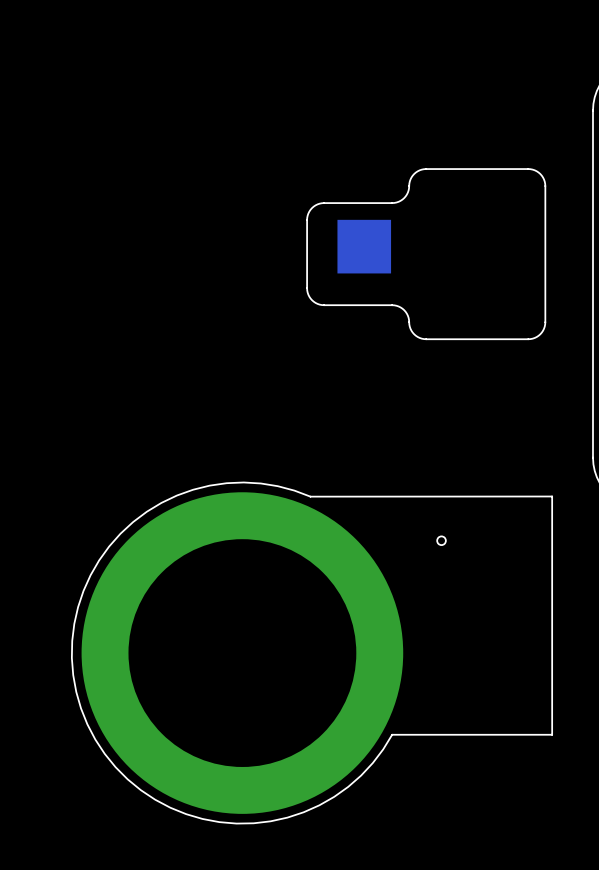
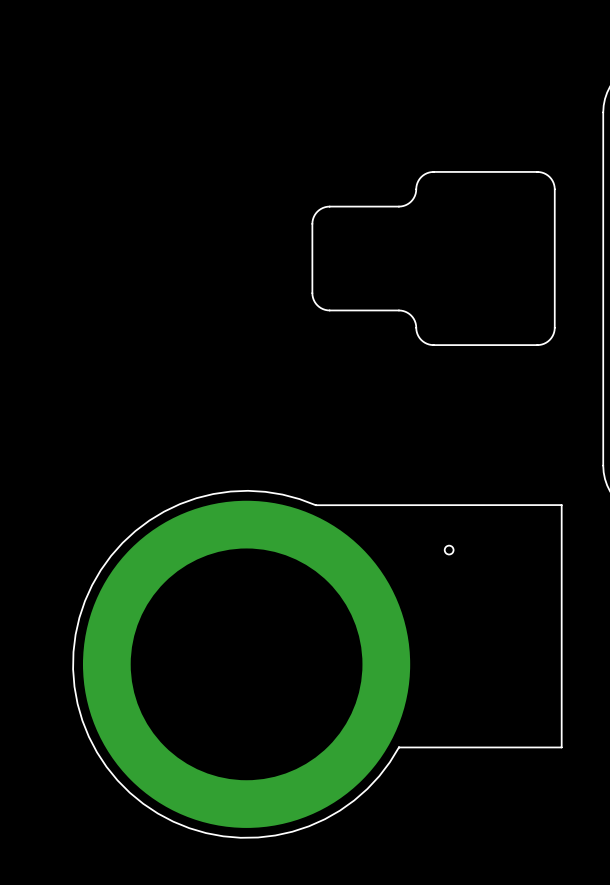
part: (364, 246) -> none

